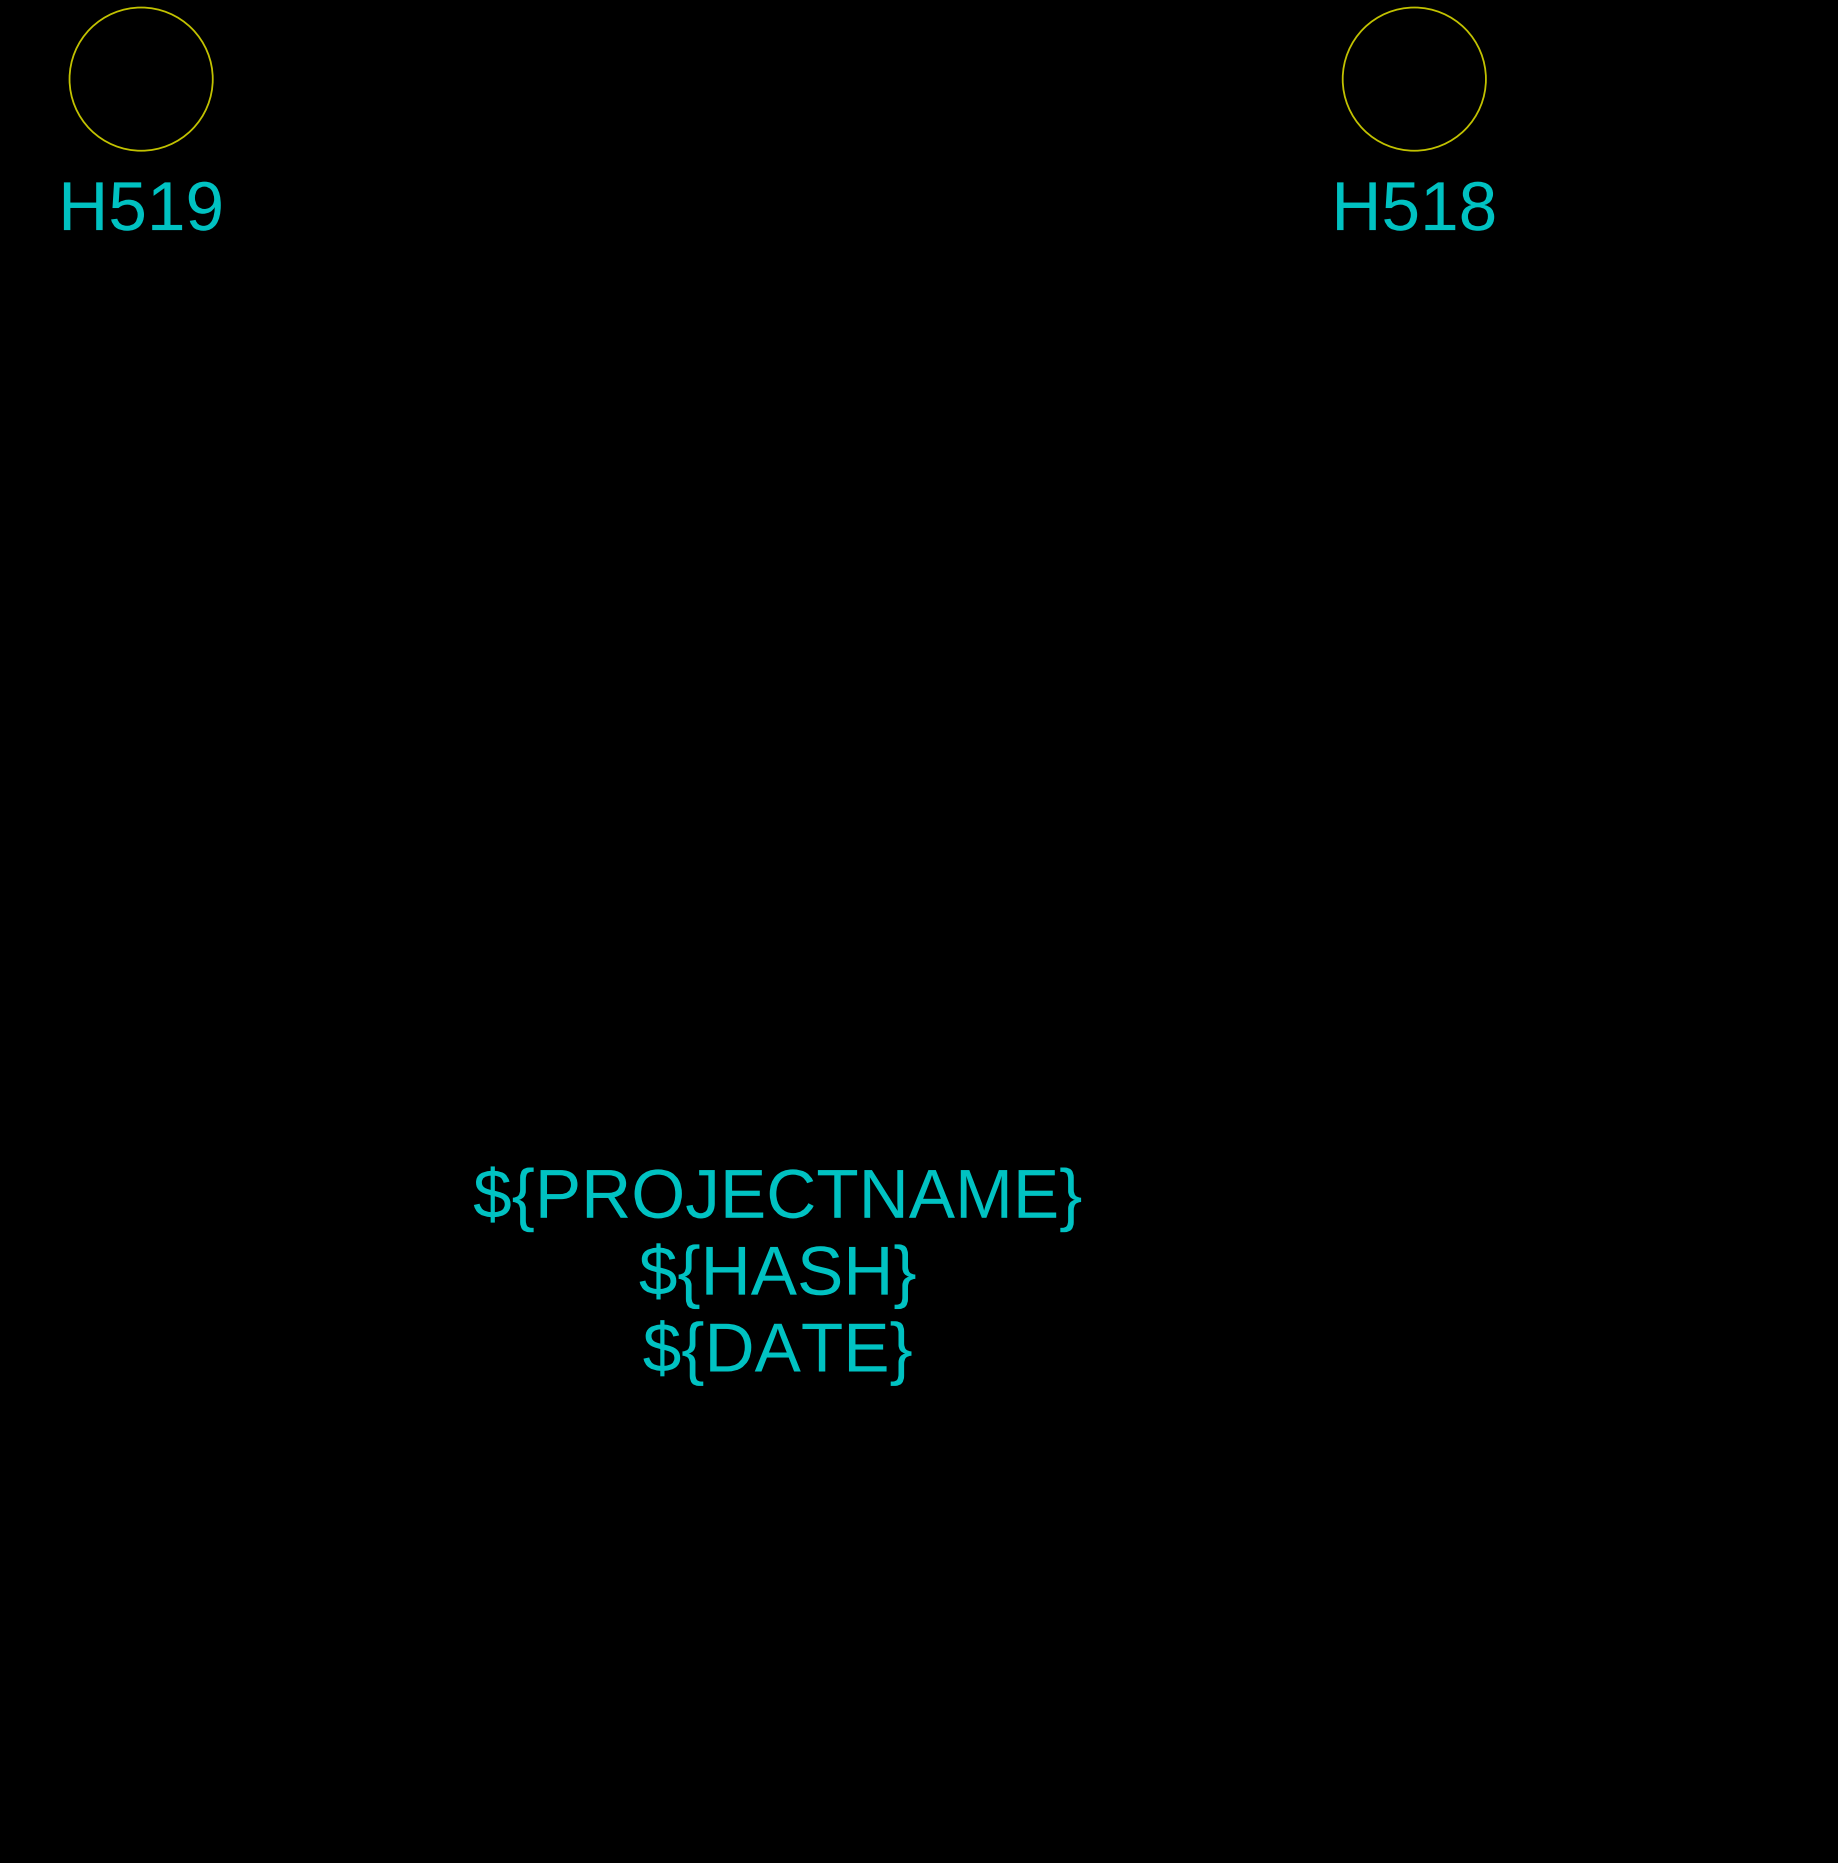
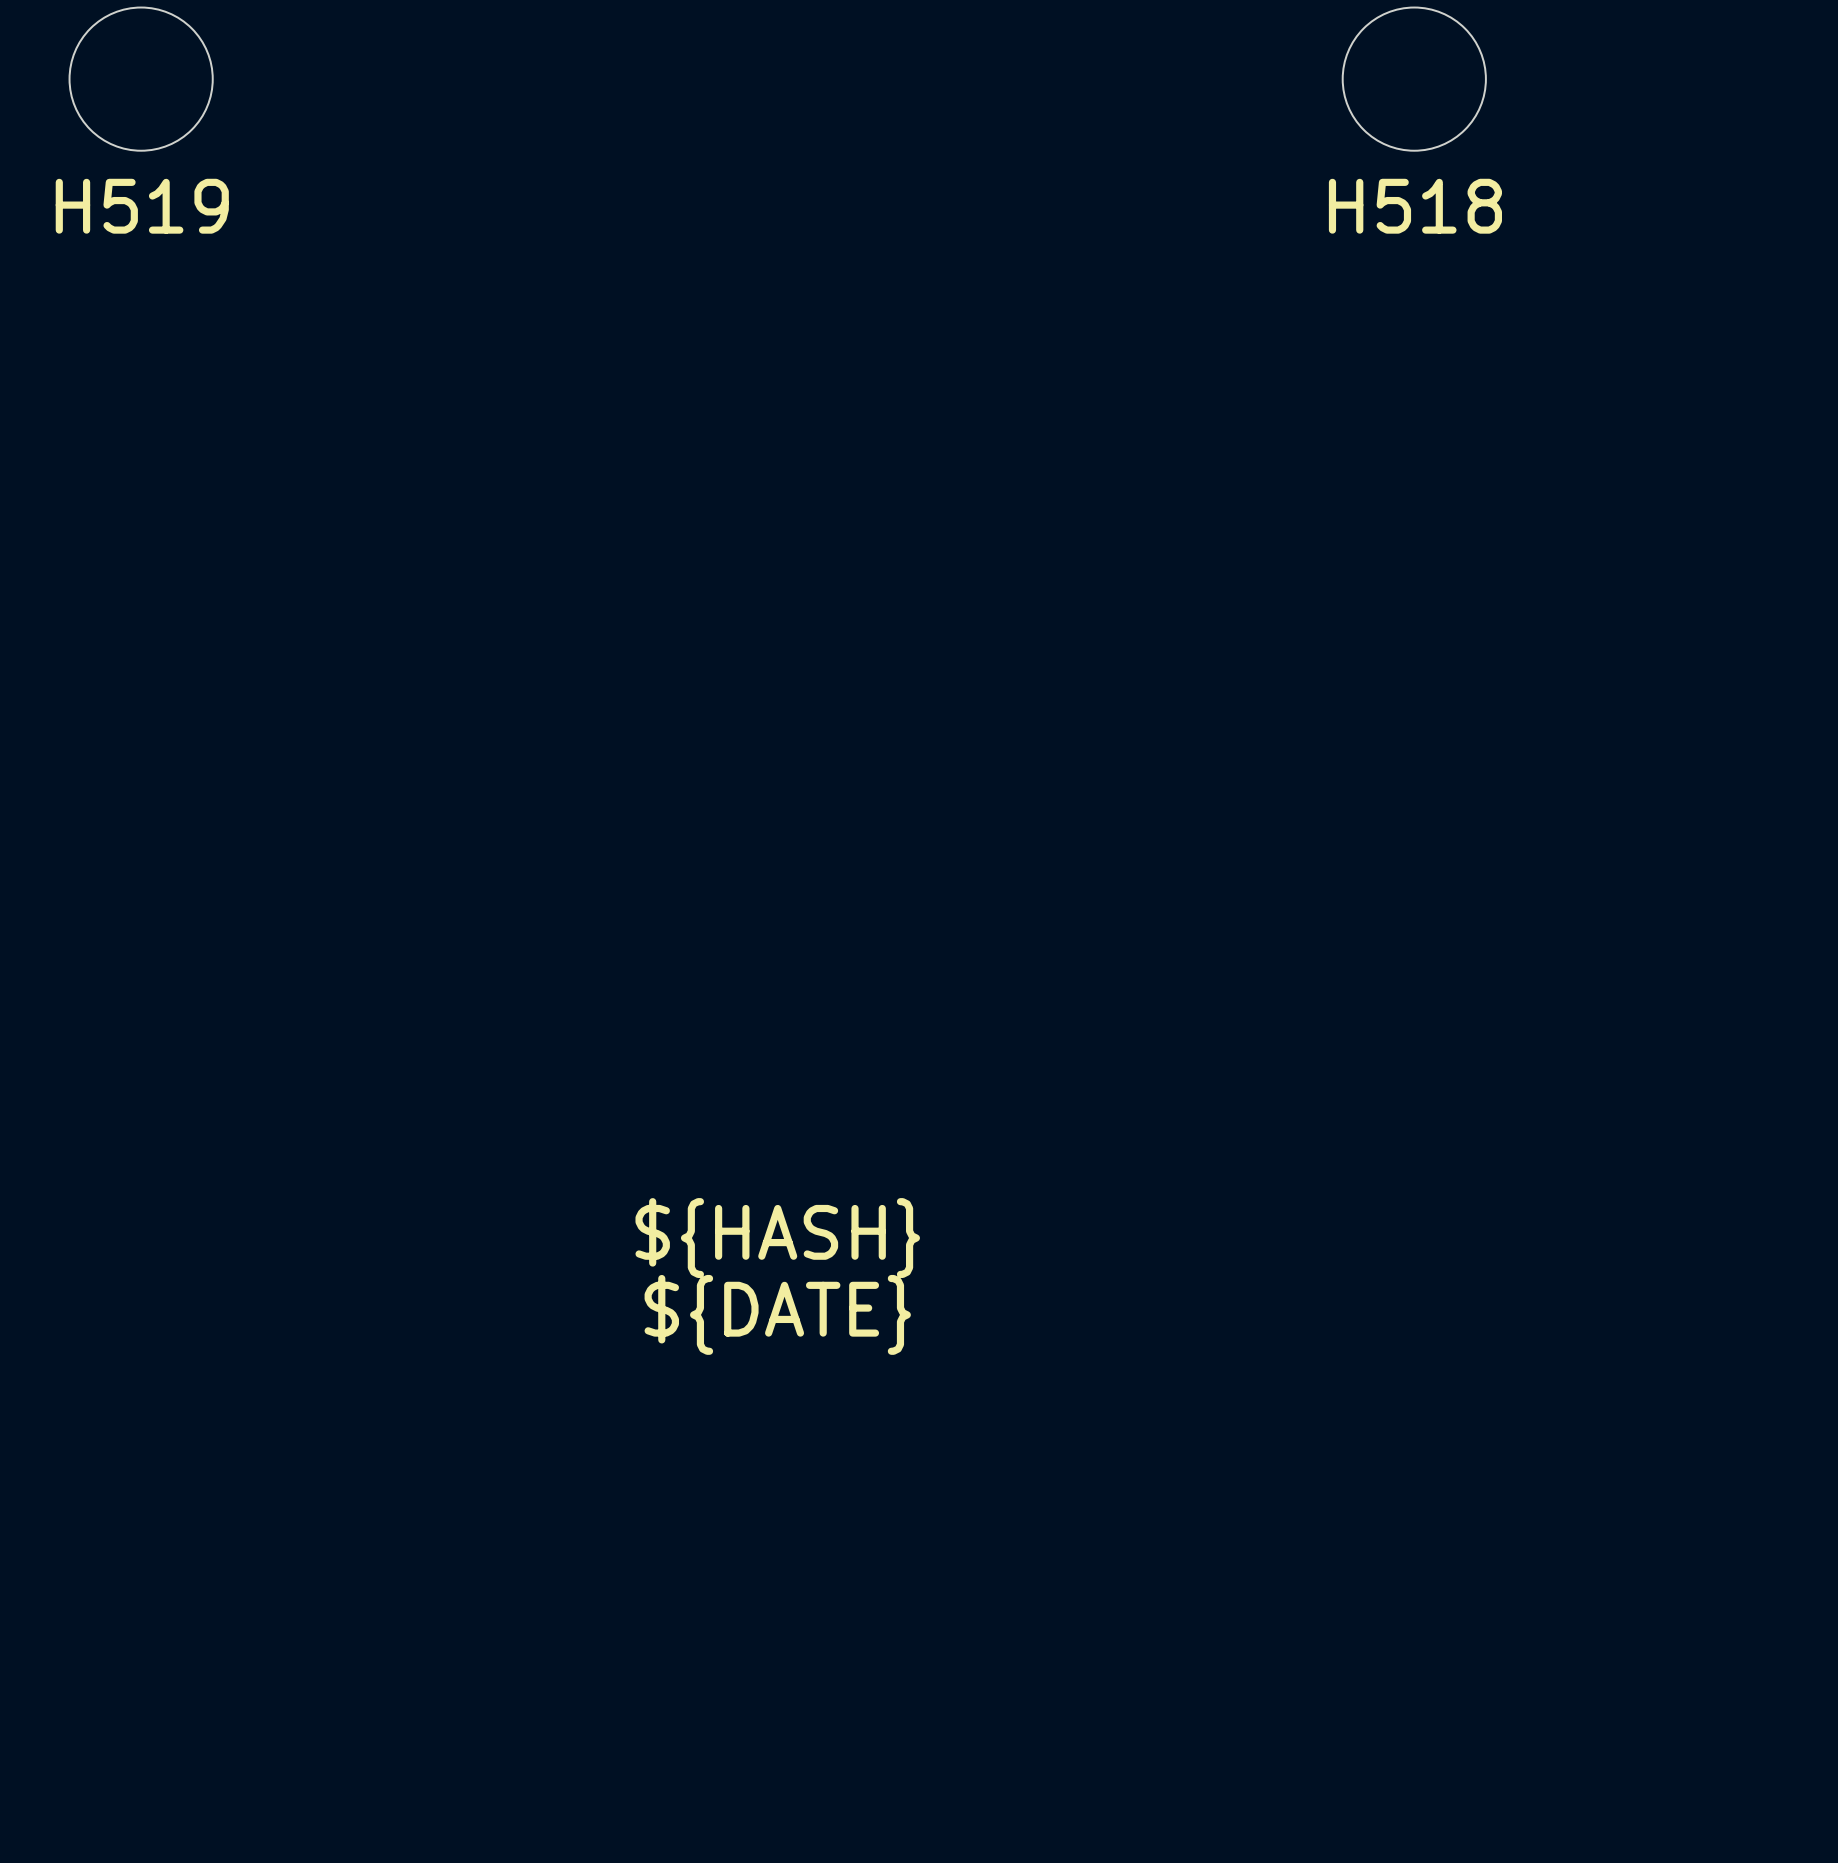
text: ${PROJECTNAME} (777, 1199) -> none
text position: ${HASH} (777, 1276) -> ${HASH} (777, 1238)
text position: ${DATE} (777, 1353) -> ${DATE} (777, 1314)

